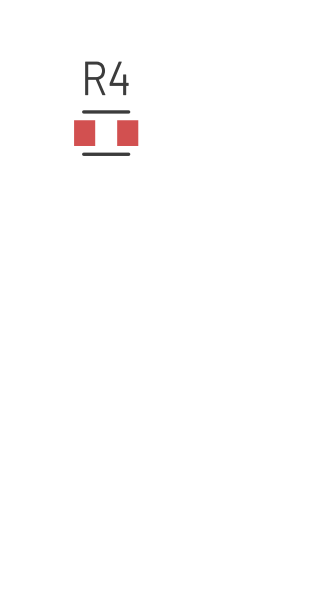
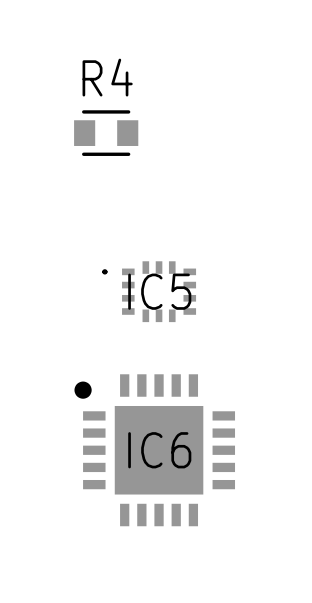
IC5: none -> (149, 291)
IC6: none -> (154, 450)

